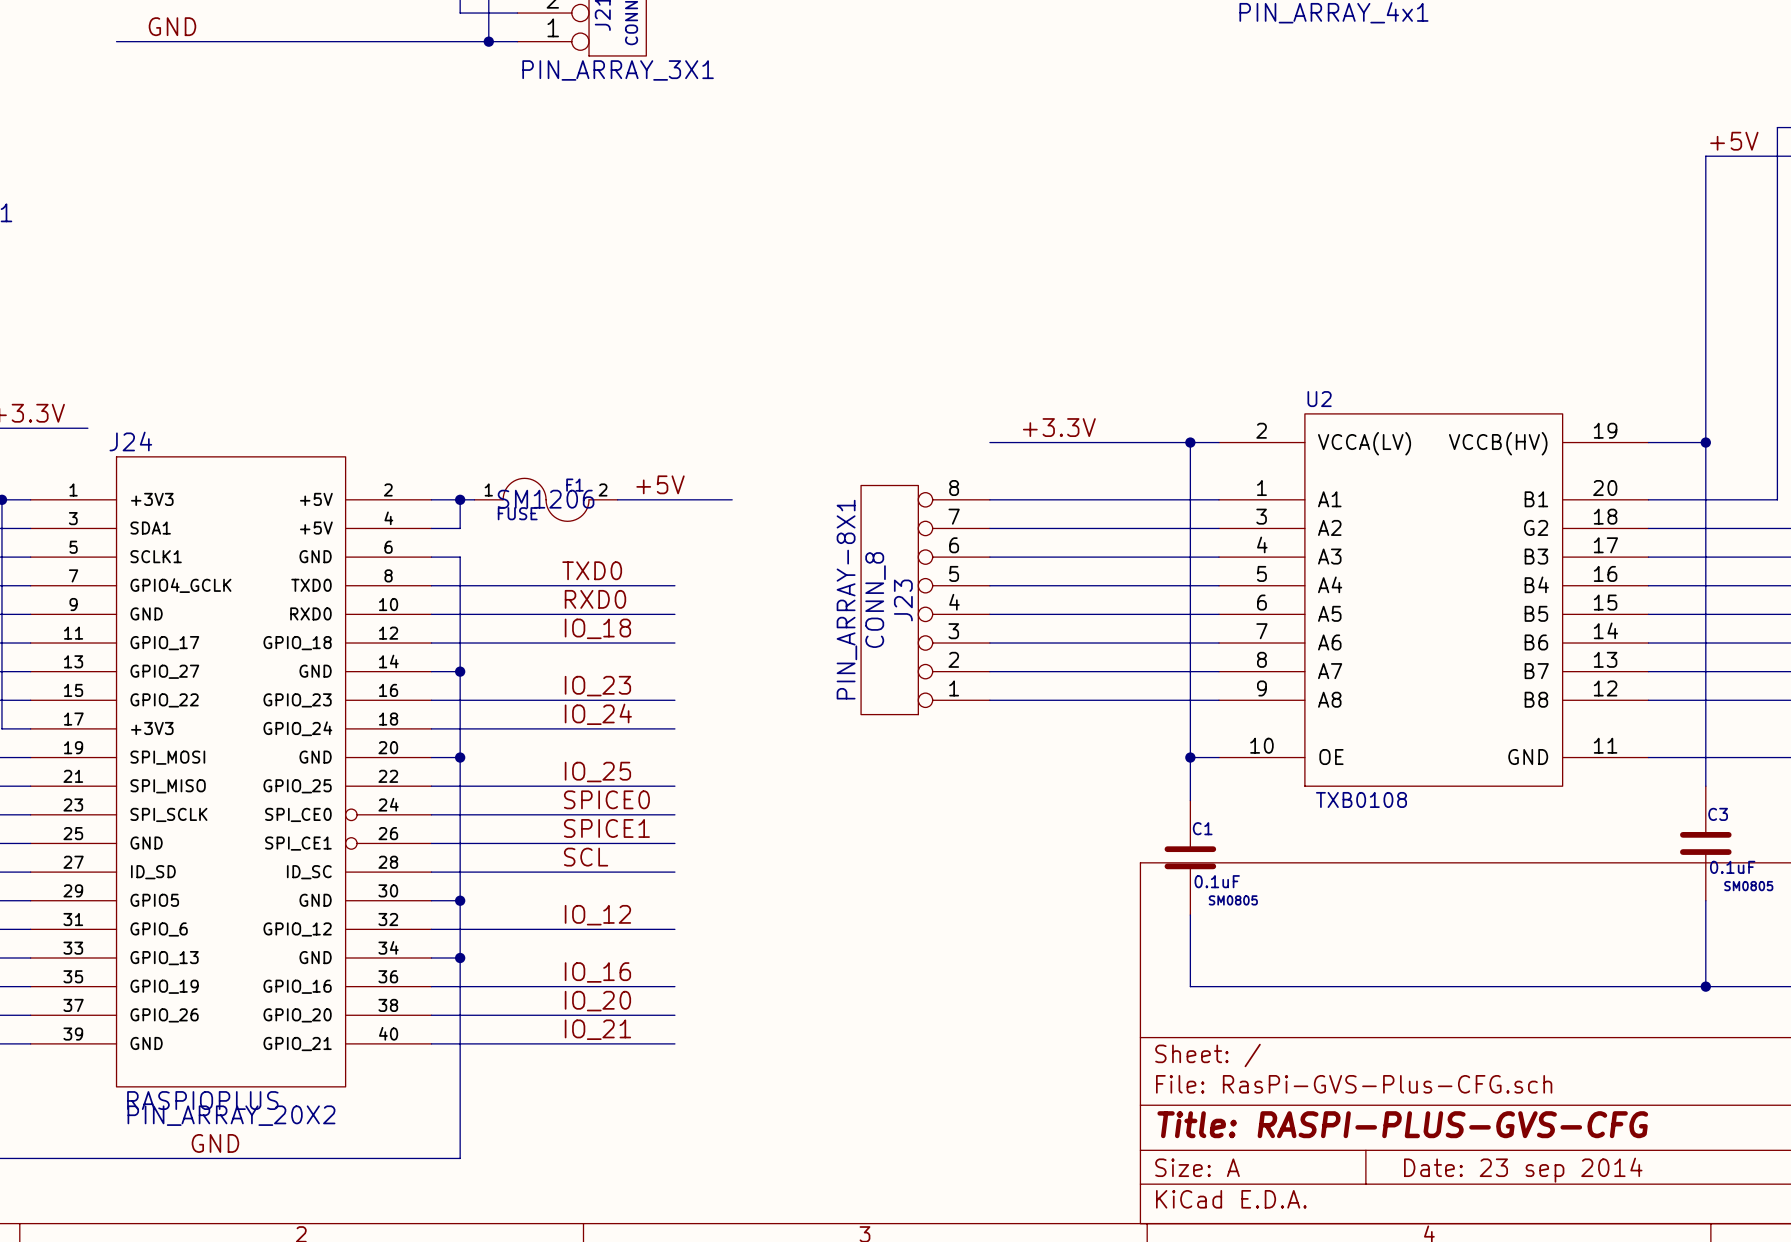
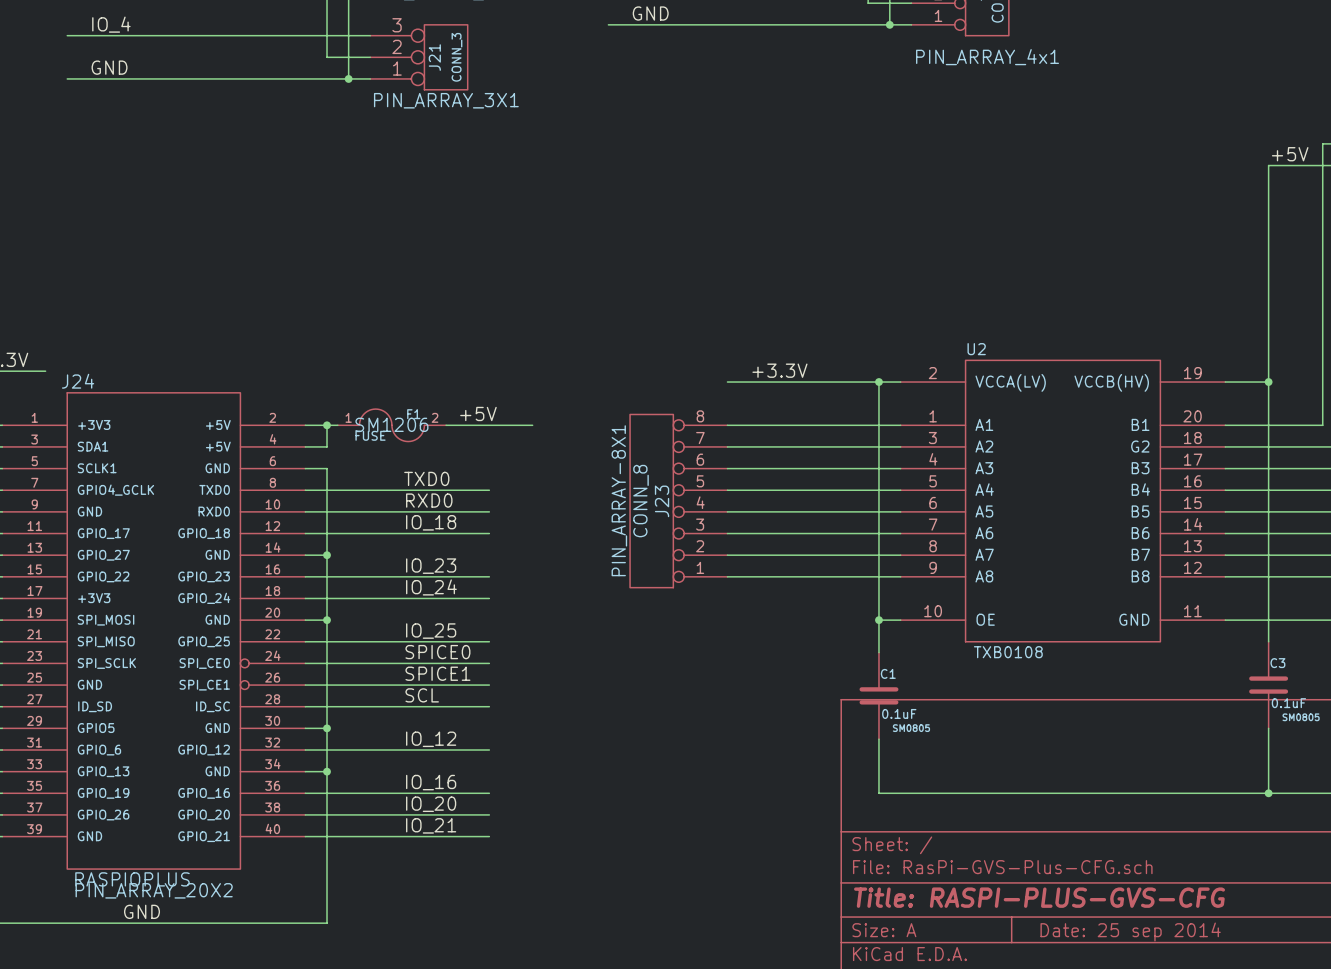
title block: Date: 23 sep 2014 (1523, 1170) -> Date: 25 sep 2014 (1130, 932)

